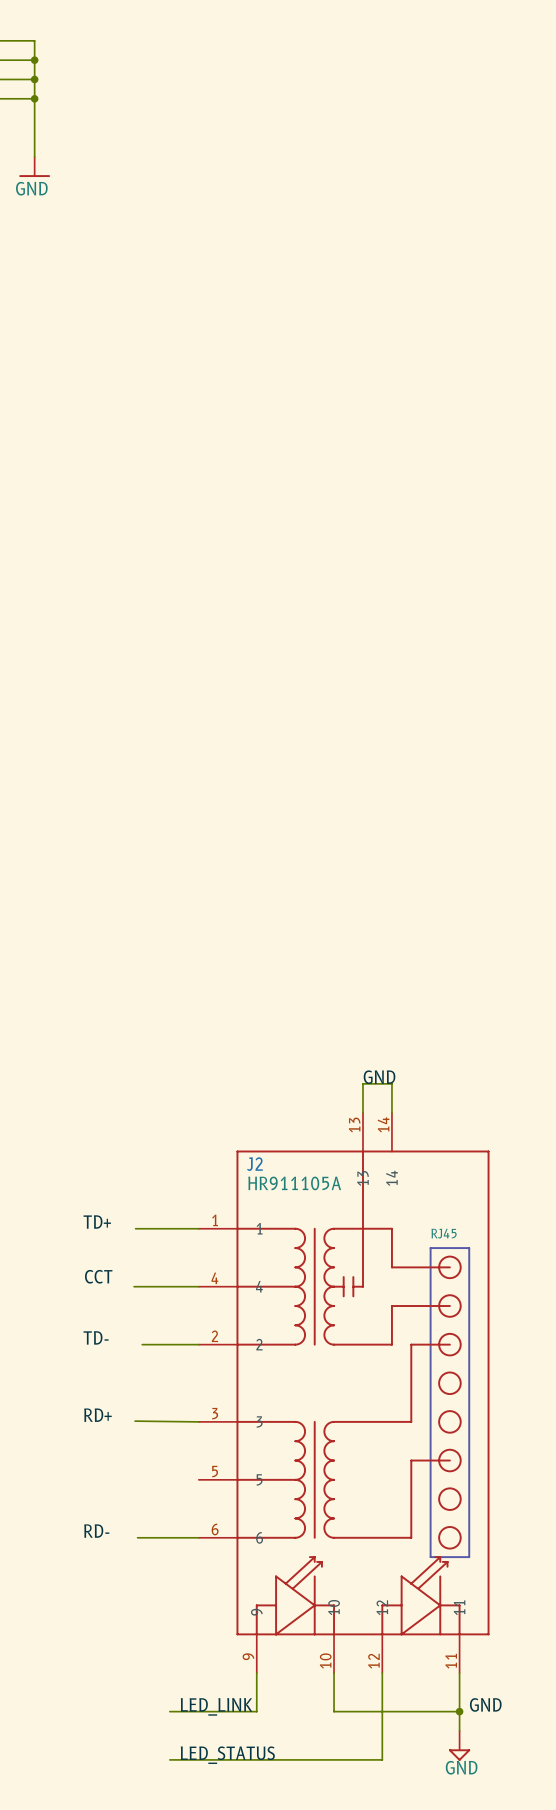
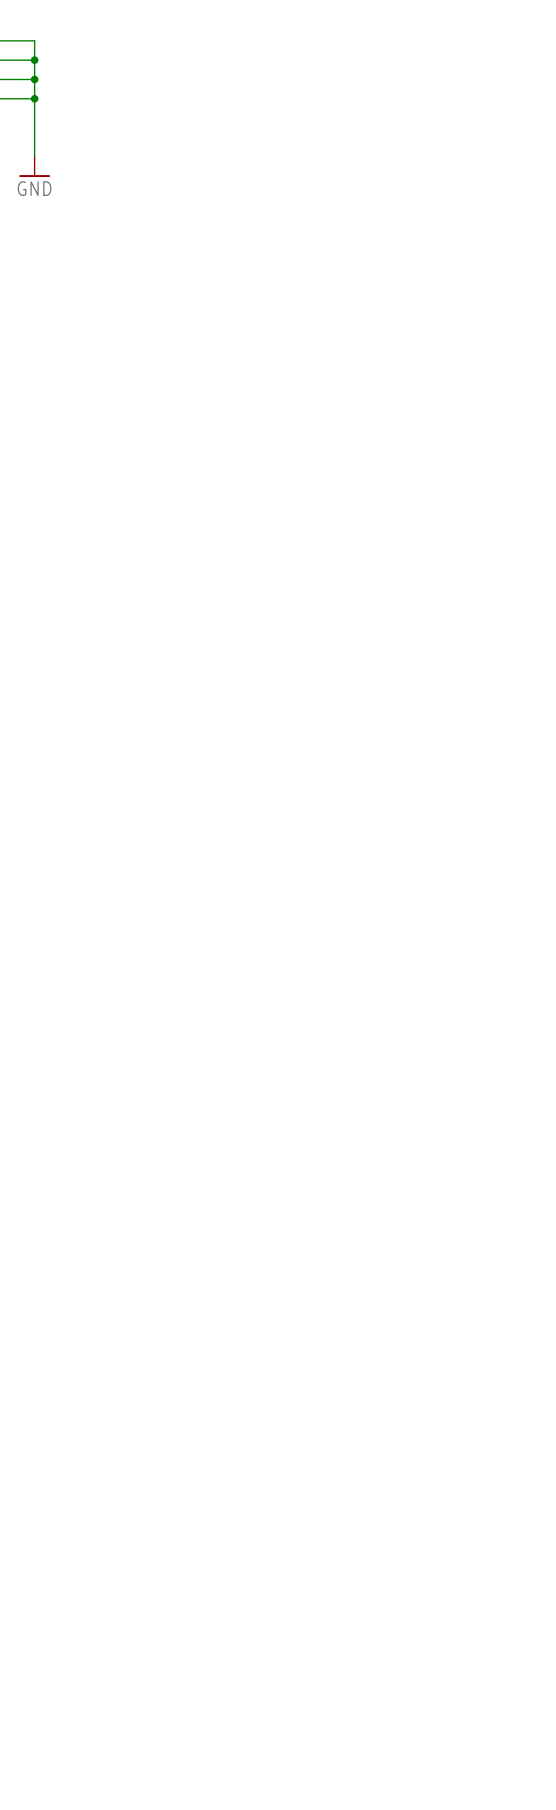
label: GND (379, 1077) -> none
wire: (362, 1112) (362, 1083) (391, 1083) (391, 1112) -> none
label: TD+ (97, 1222) -> none
wire: (135, 1228) (198, 1228) -> none
label: CCT (98, 1276) -> none
wire: (134, 1286) (198, 1286) -> none
label: TD- (96, 1337) -> none
wire: (142, 1344) (198, 1344) -> none
J2: HR911105A (344, 1392) -> none
label: RD+ (97, 1415) -> none
wire: (135, 1421) (198, 1421) -> none
label: RD- (96, 1531) -> none
wire: (137, 1537) (198, 1537) -> none
wire: (256, 1673) (256, 1711) (169, 1711) -> none
wire: (334, 1673) (334, 1711) (459, 1711) -> none
wire: (382, 1673) (382, 1759) (169, 1759) -> none
wire: (459, 1673) (459, 1730) -> none
label: GND (485, 1704) -> none
label: LED_LINK (216, 1706) -> none
junction: (459, 1711) -> none
power symbol: GND (459, 1745) -> none
label: LED_STATUS (227, 1755) -> none

